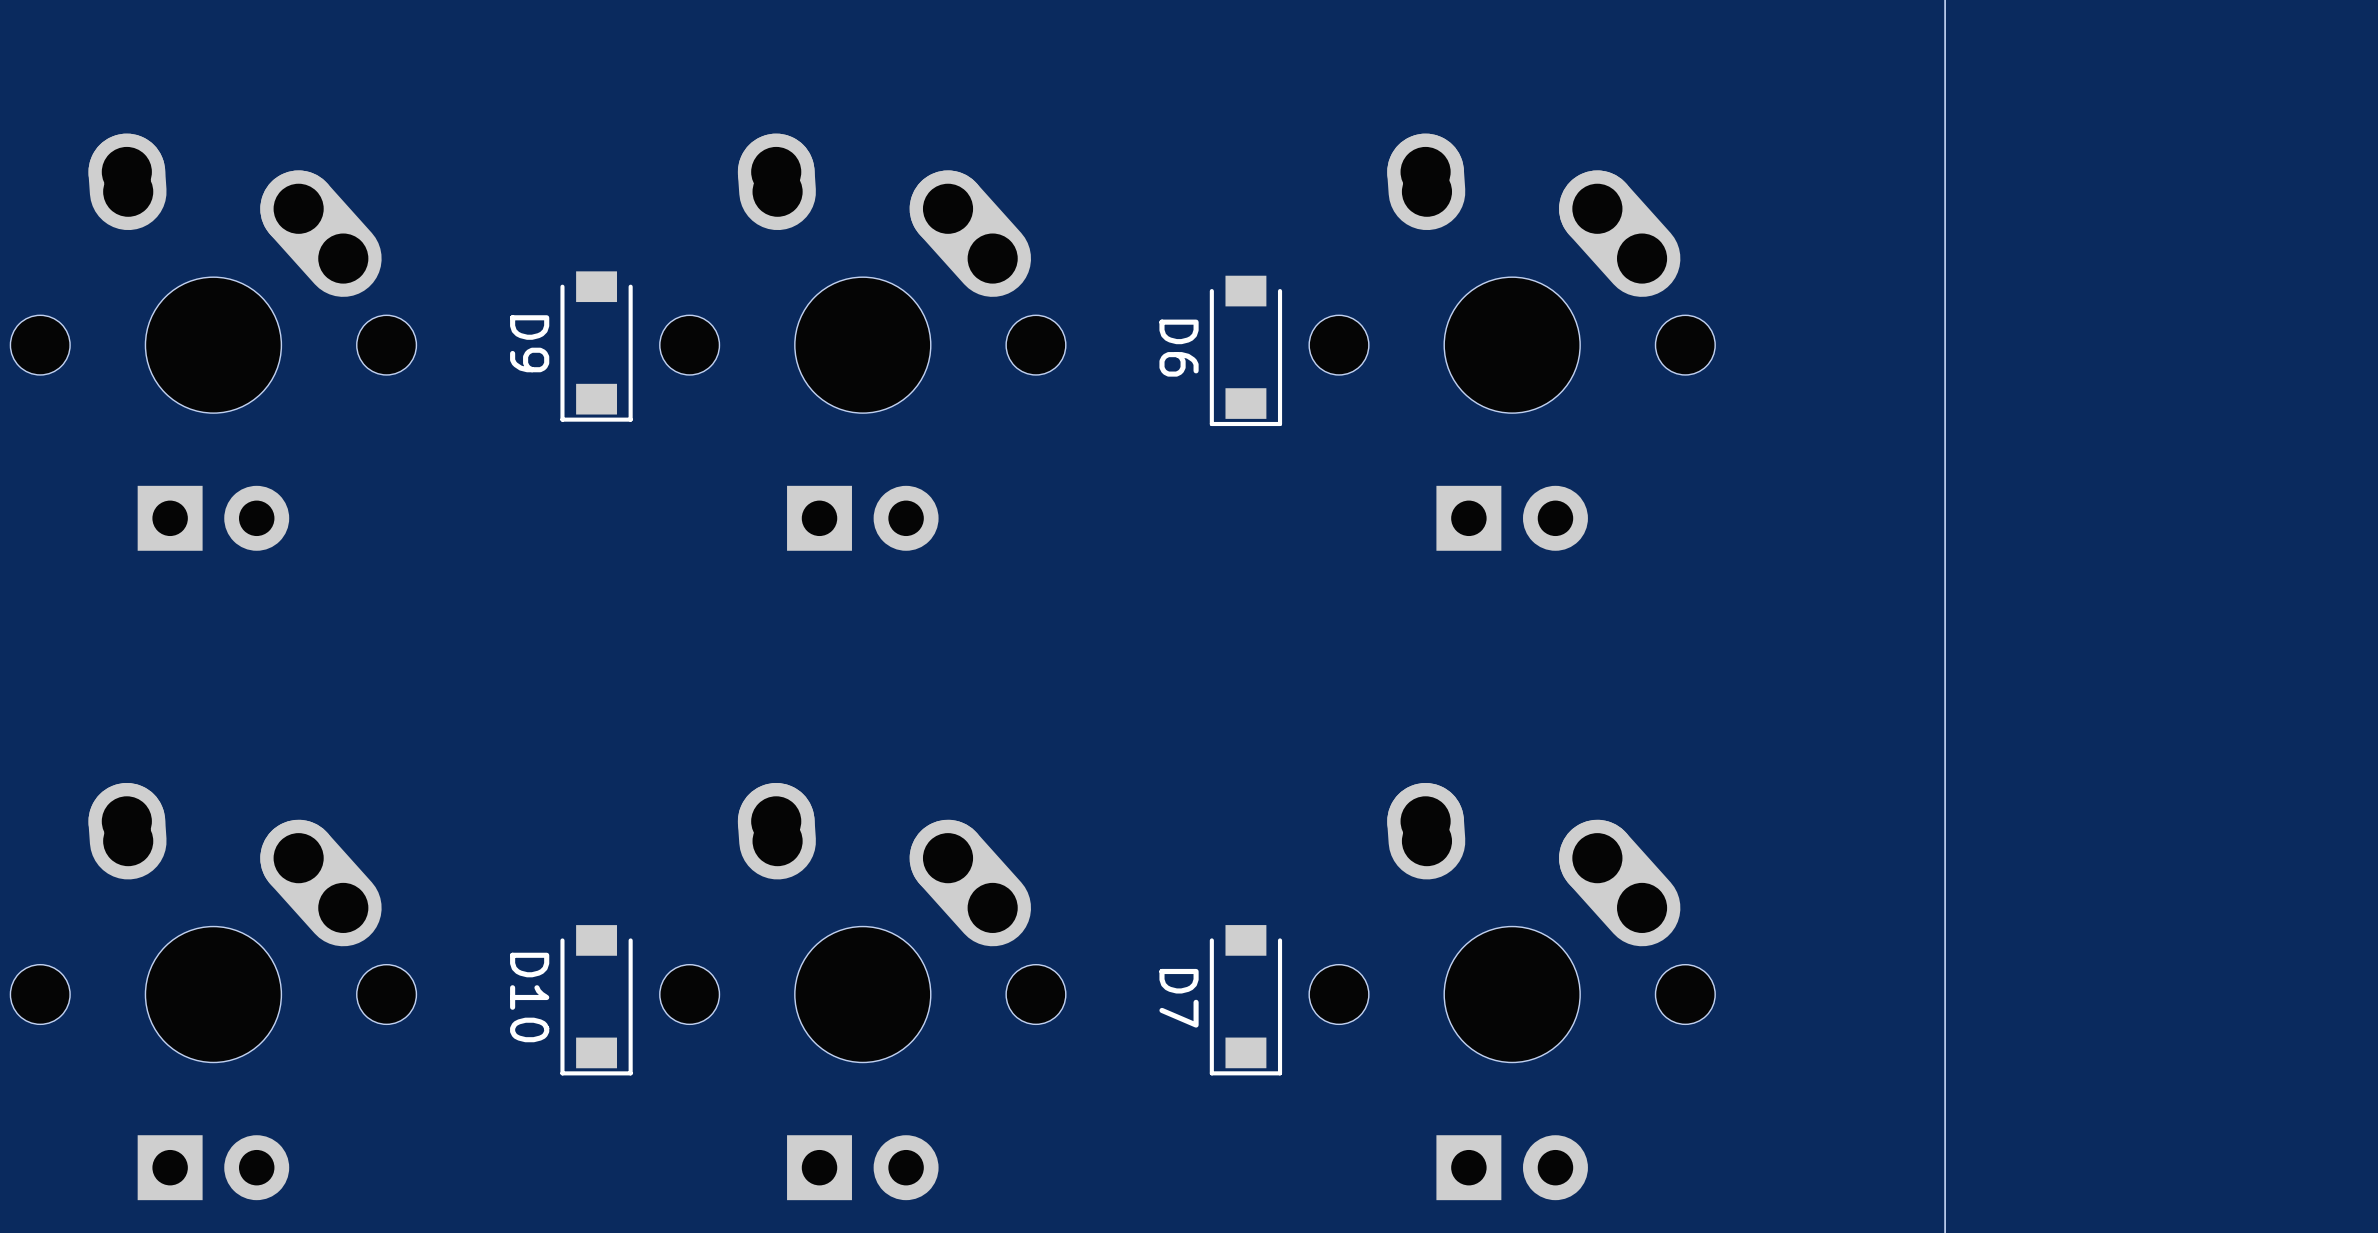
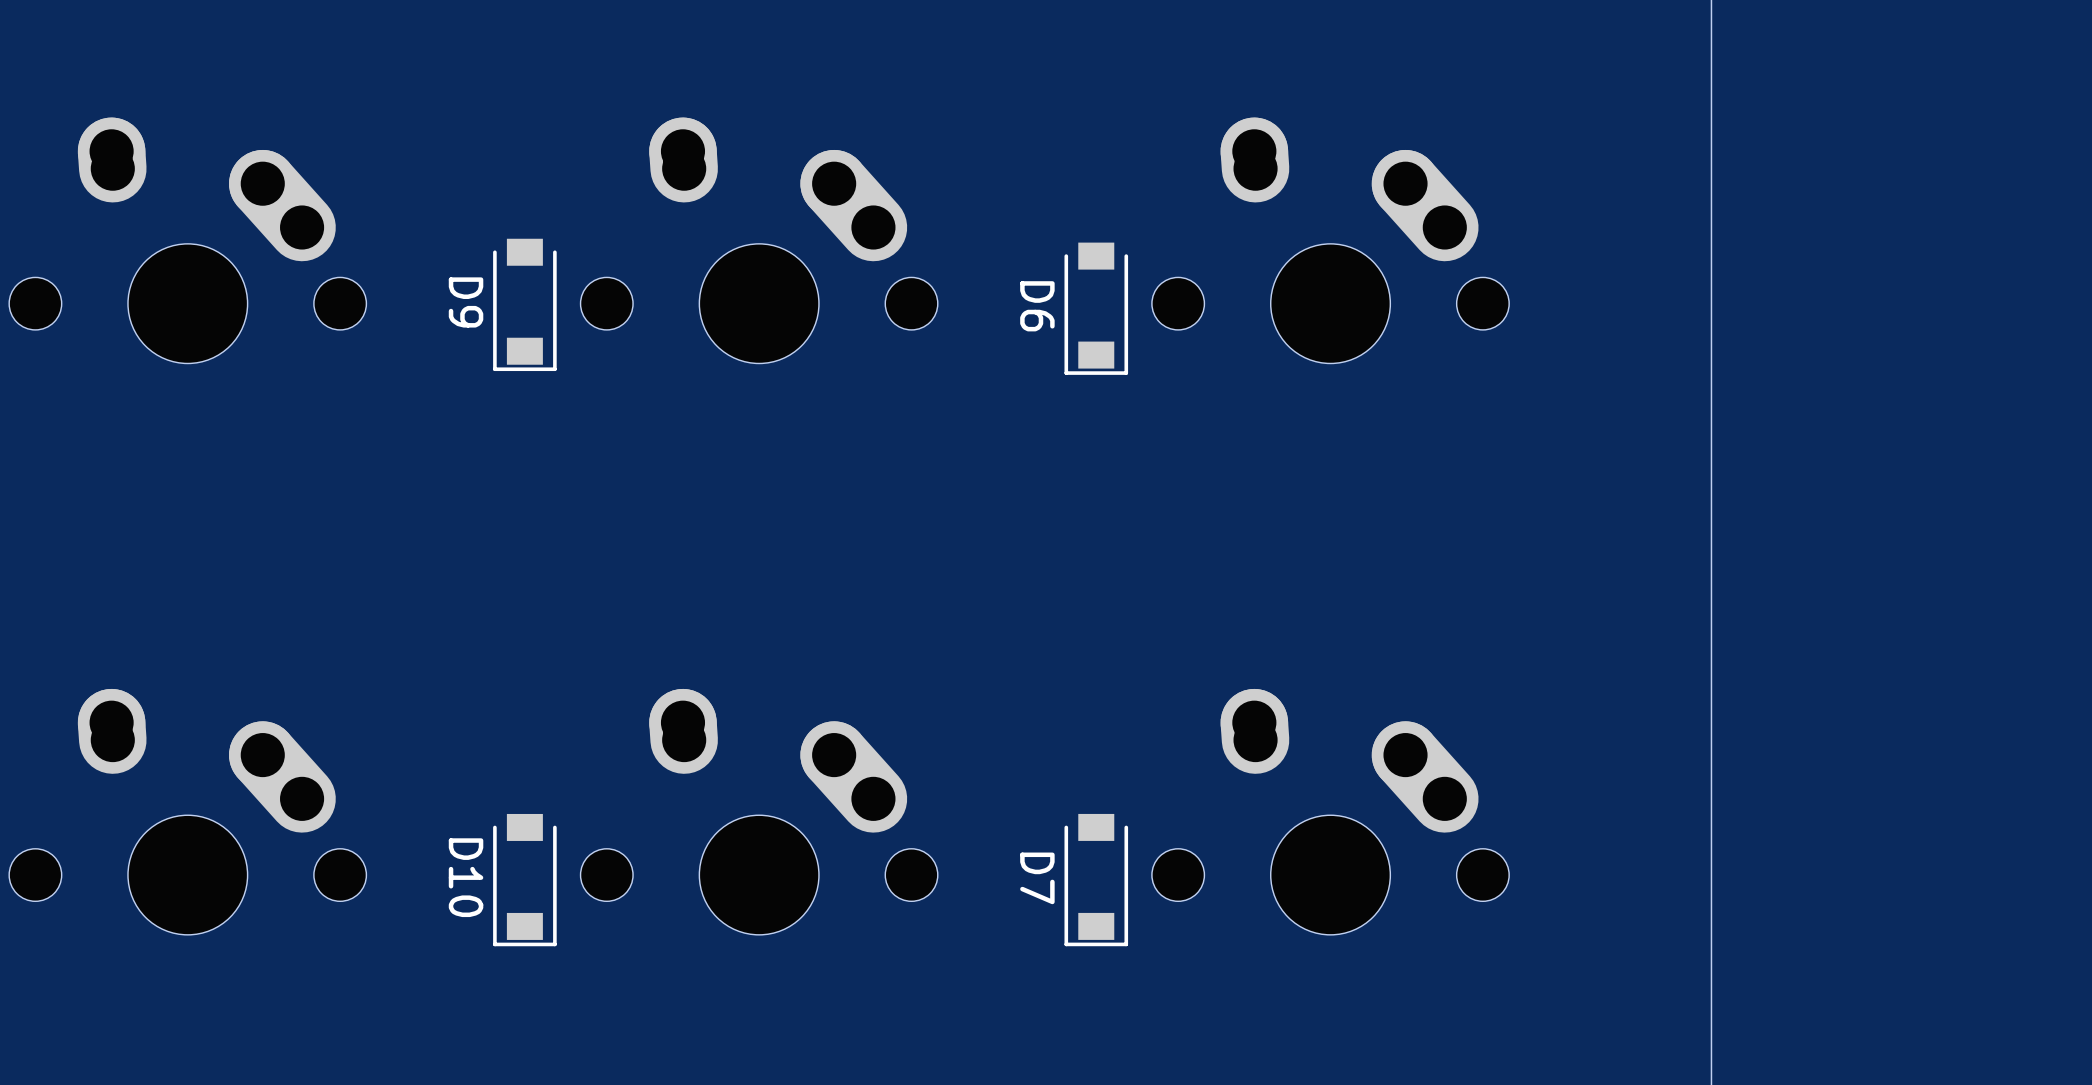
part: (213, 342) -> none
part: (862, 342) -> none
part: (1512, 342) -> none
part: (213, 991) -> none
part: (862, 991) -> none
part: (1512, 991) -> none

